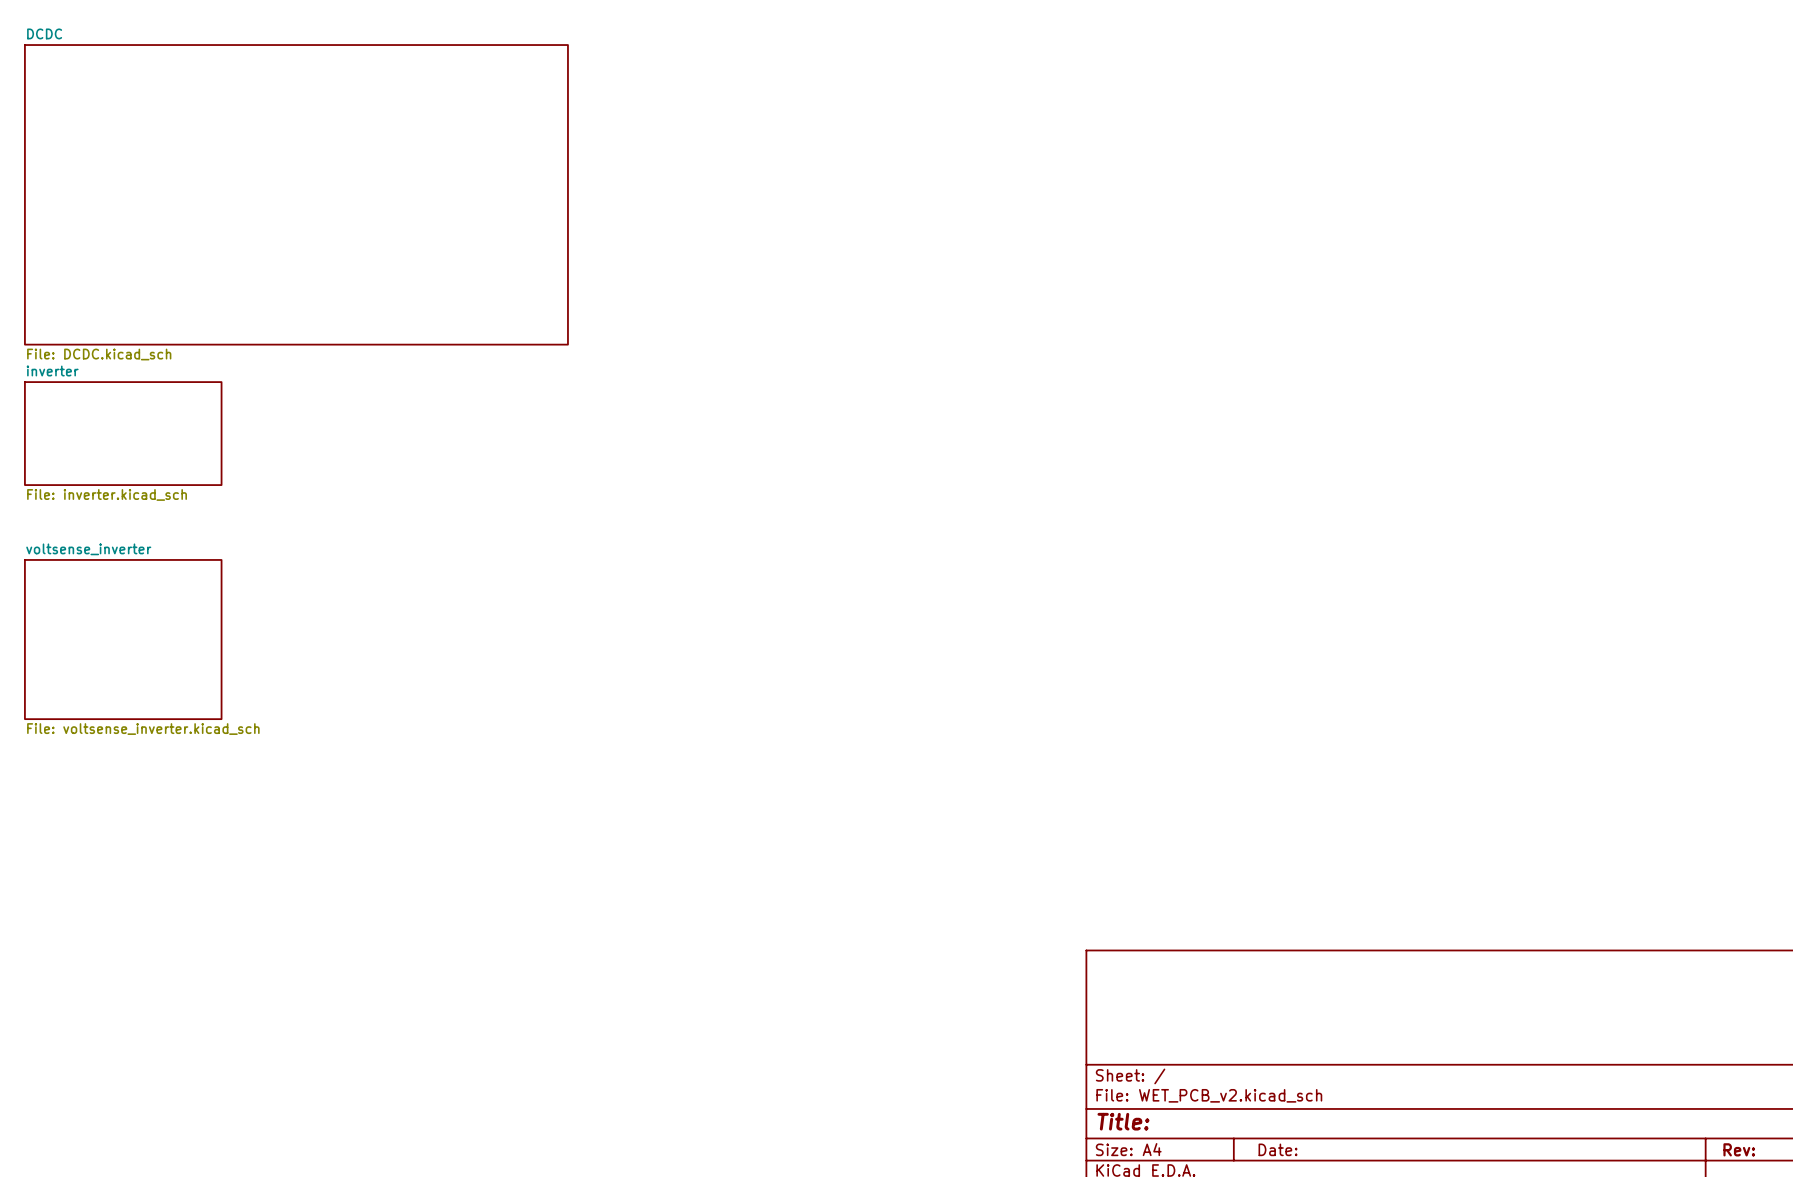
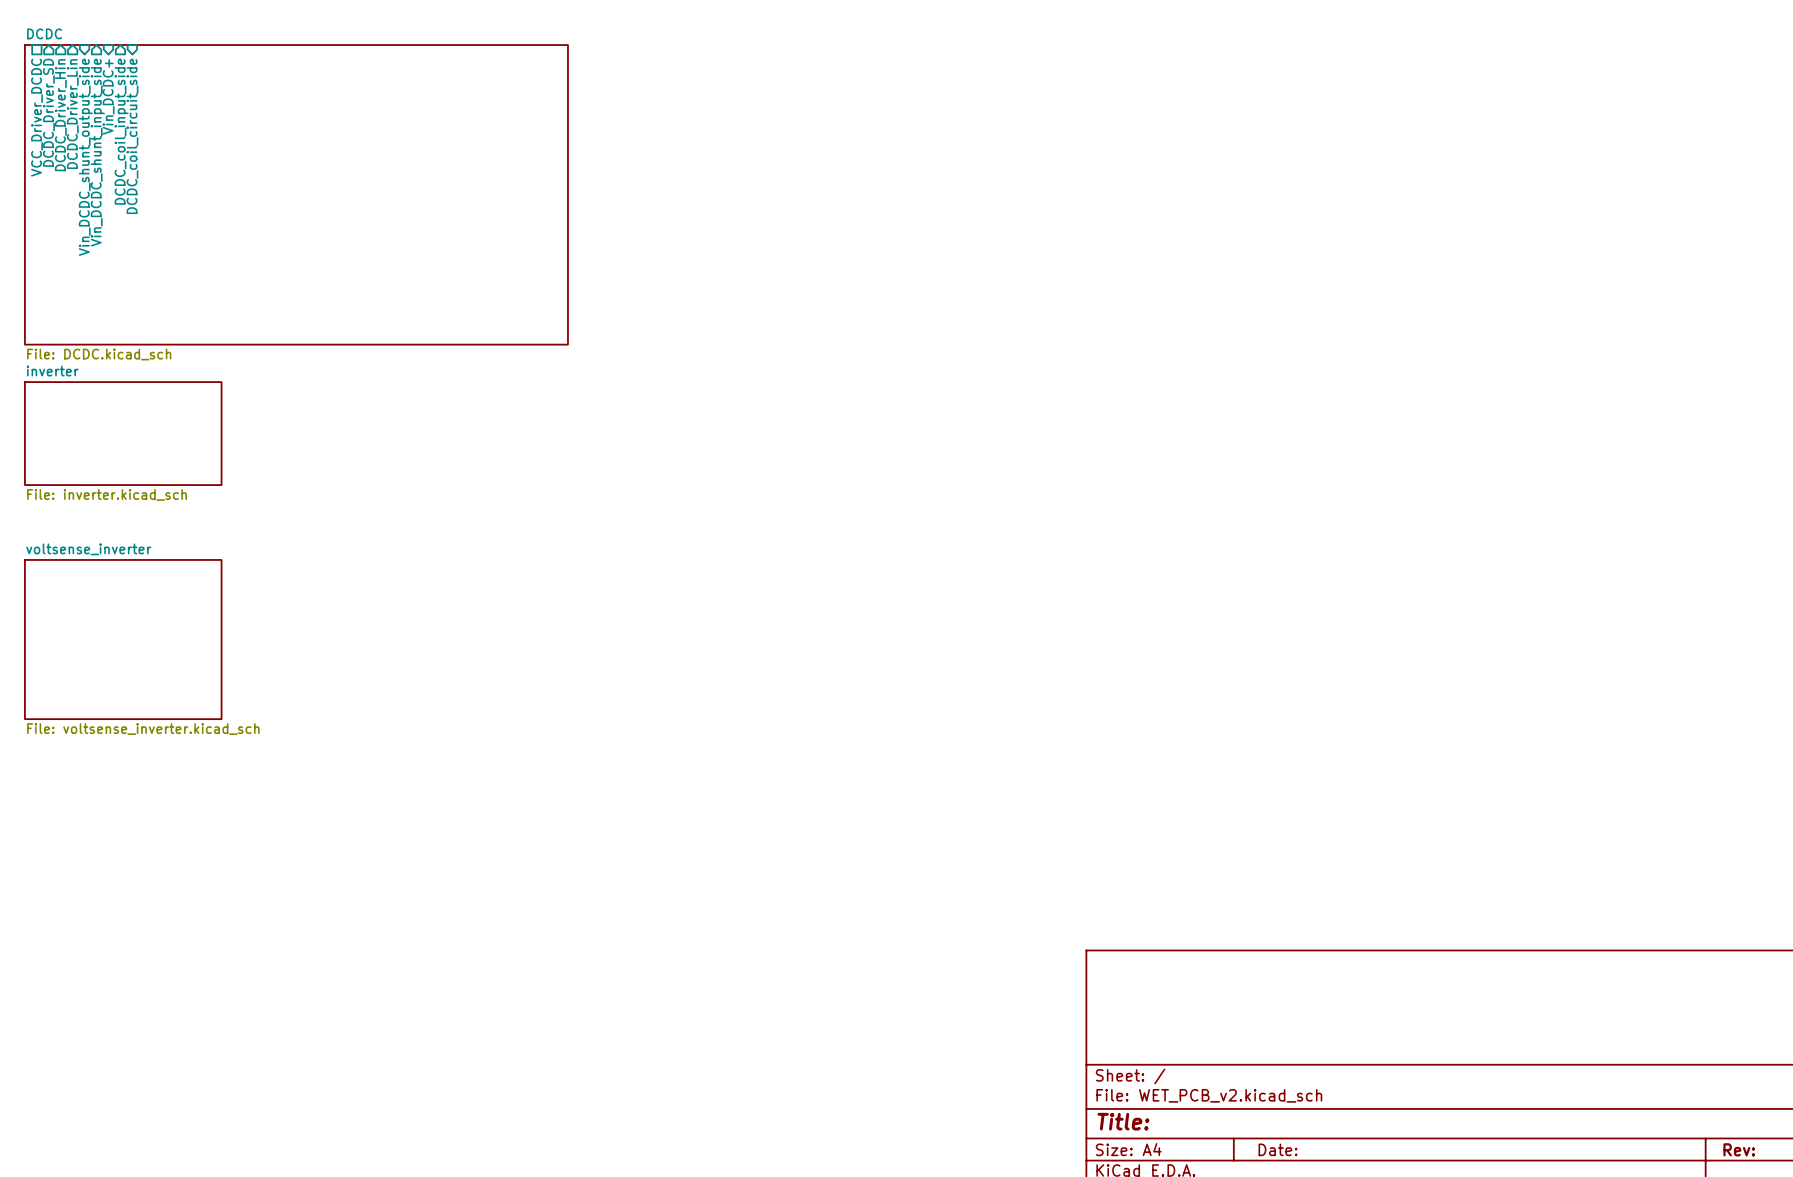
sheet pin: none -> Vin_DCDC+ (108, 96)
sheet pin: none -> DCDC_Driver_SD (48, 112)
sheet pin: none -> DCDC_Driver_Lin (72, 114)
sheet pin: none -> DCDC_Driver_Hin (60, 115)
sheet pin: none -> VCC_Driver_DCDC (36, 117)
sheet pin: none -> DCDC_coil_input_side (121, 131)
sheet pin: none -> DCDC_coil_circuit_side (132, 136)
sheet pin: none -> Vin_DCDC_shunt_input_side (97, 152)
sheet pin: none -> Vin_DCDC_shunt_output_side (85, 157)

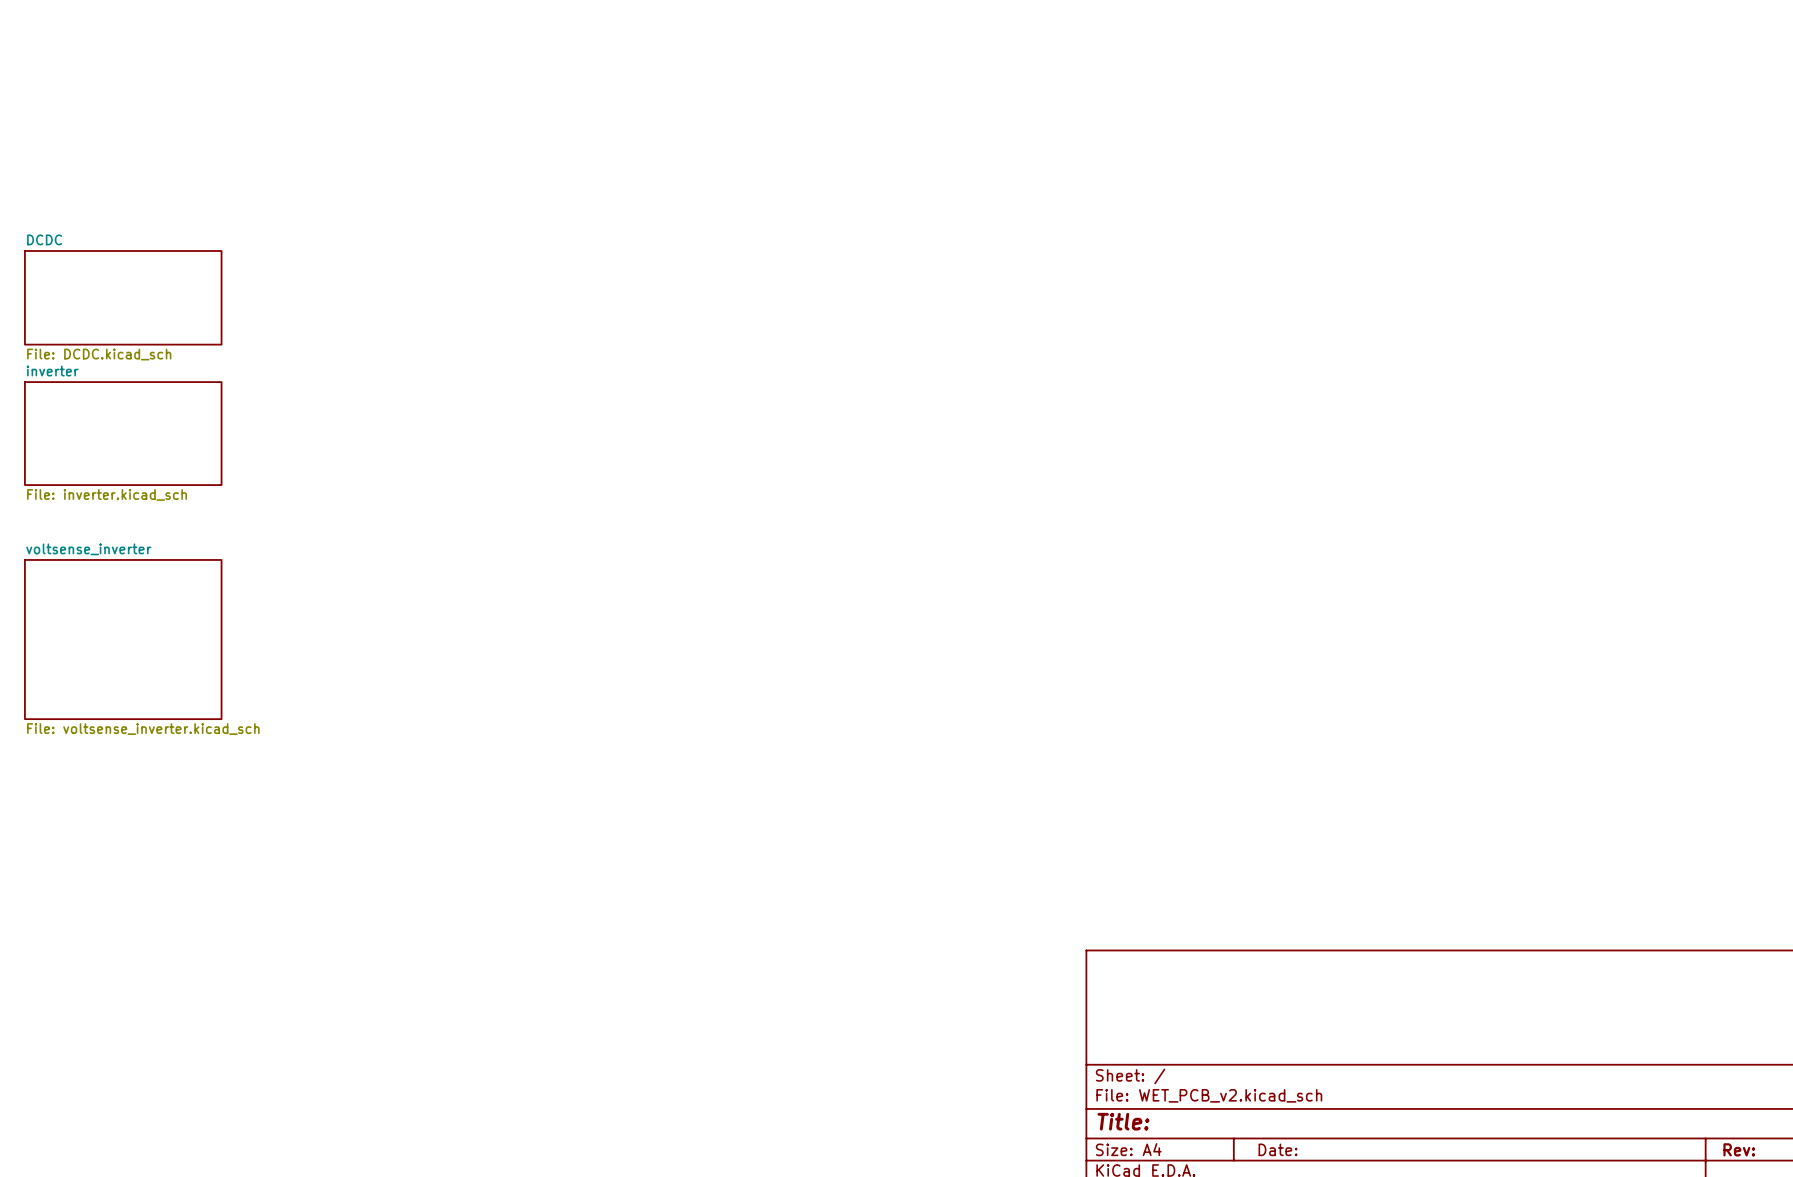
sheet pin: Vin_DCDC+ (108, 96) -> none
sheet pin: DCDC_Driver_SD (48, 112) -> none
sheet pin: DCDC_Driver_Lin (72, 114) -> none
sheet pin: DCDC_Driver_Hin (60, 115) -> none
sheet pin: VCC_Driver_DCDC (36, 117) -> none
sheet pin: DCDC_coil_input_side (121, 131) -> none
sheet pin: DCDC_coil_circuit_side (132, 136) -> none
sheet pin: Vin_DCDC_shunt_input_side (97, 152) -> none
sheet pin: Vin_DCDC_shunt_output_side (85, 157) -> none
sheet DCDC: File: DCDC.kicad_sch (296, 194) -> none
sheet DCDC: none -> File: DCDC.kicad_sch (123, 297)

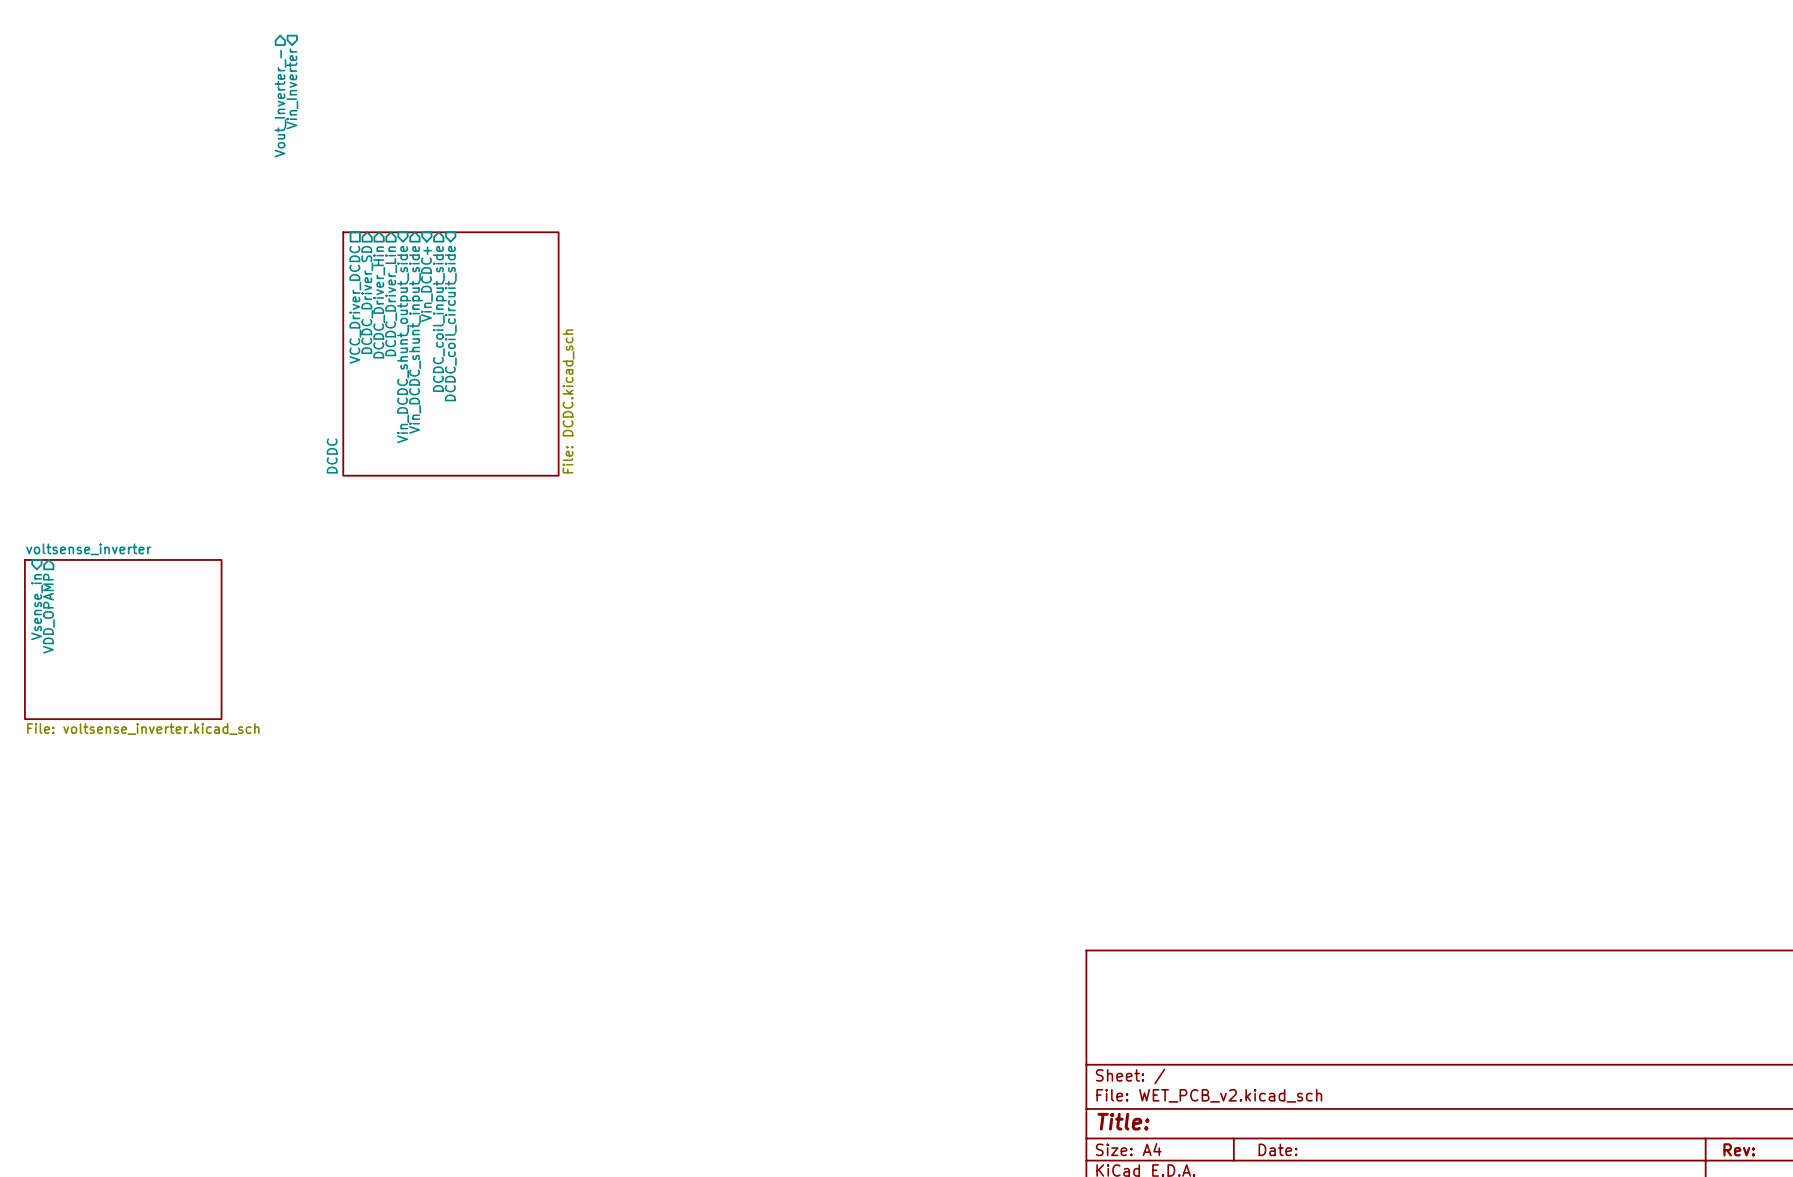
sheet pin: none -> Vin_Inverter (292, 88)
sheet pin: none -> Vout_Inverter_- (280, 103)
sheet pin: none -> Vin_DCDC+ (426, 284)
sheet DCDC: File: DCDC.kicad_sch (123, 297) -> none
sheet pin: none -> DCDC_Driver_SD (367, 299)
sheet pin: none -> DCDC_Driver_Lin (391, 301)
sheet pin: none -> DCDC_Driver_Hin (379, 302)
sheet pin: none -> VCC_Driver_DCDC (355, 304)
sheet pin: none -> DCDC_coil_input_side (439, 318)
sheet pin: none -> DCDC_coil_circuit_side (450, 323)
sheet pin: none -> Vin_DCDC_shunt_input_side (416, 339)
sheet pin: none -> Vin_DCDC_shunt_output_side (404, 344)
sheet DCDC: none -> File: DCDC.kicad_sch (450, 353)
sheet inverter: File: inverter.kicad_sch (123, 433) -> none
sheet pin: none -> Vsense_in (36, 607)
sheet pin: none -> VDD_OPAMP (48, 613)

